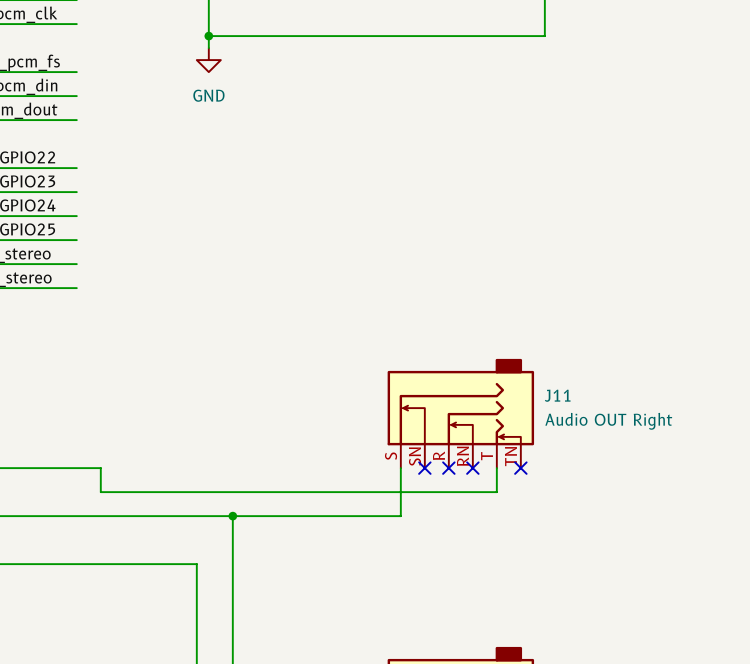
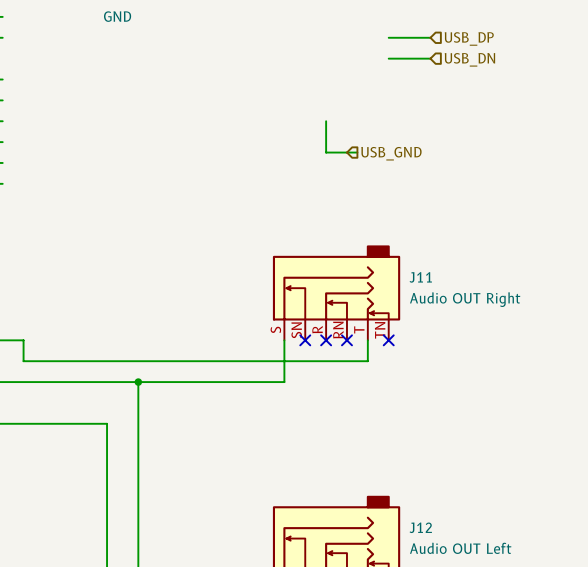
wire: none -> (388, 37) (430, 37)
hierarchical label: none -> USB_DP (469, 38)
wire: none -> (388, 58) (430, 58)
hierarchical label: none -> USB_DN (469, 59)
wire: none -> (326, 121) (326, 152) (357, 152)
hierarchical label: none -> USB_GND (391, 153)

